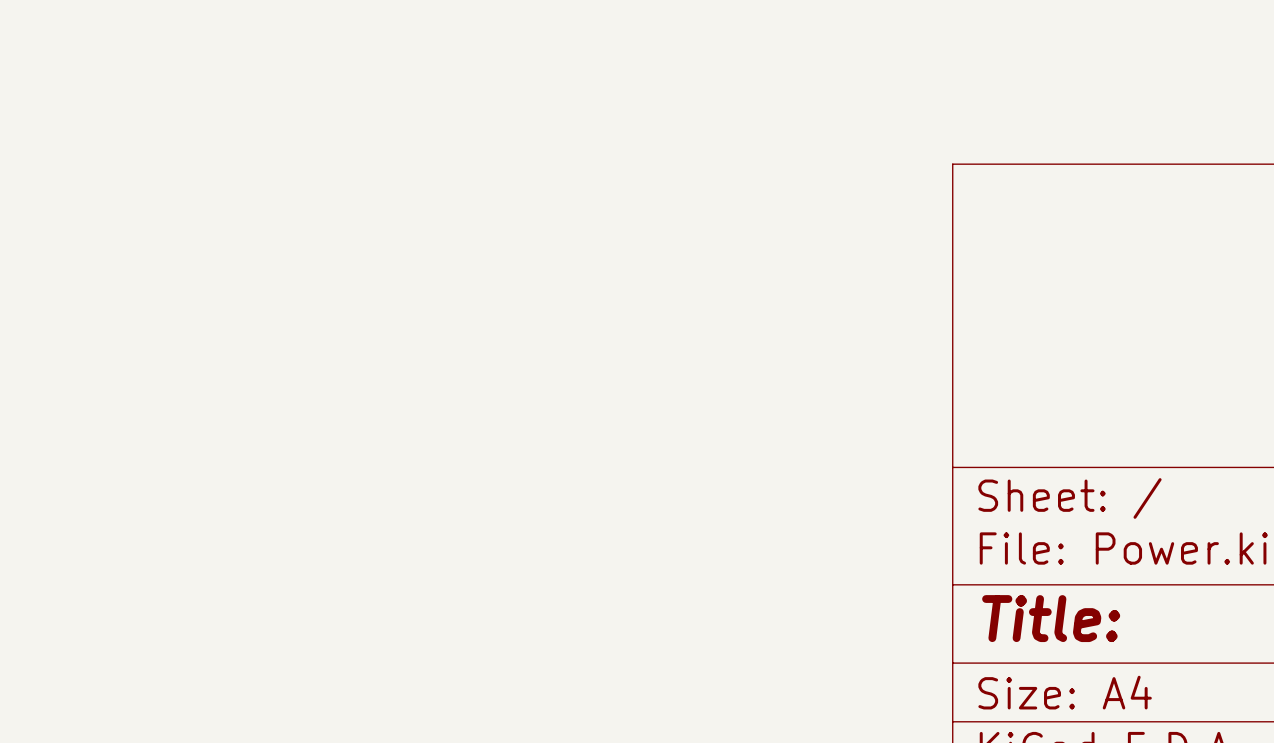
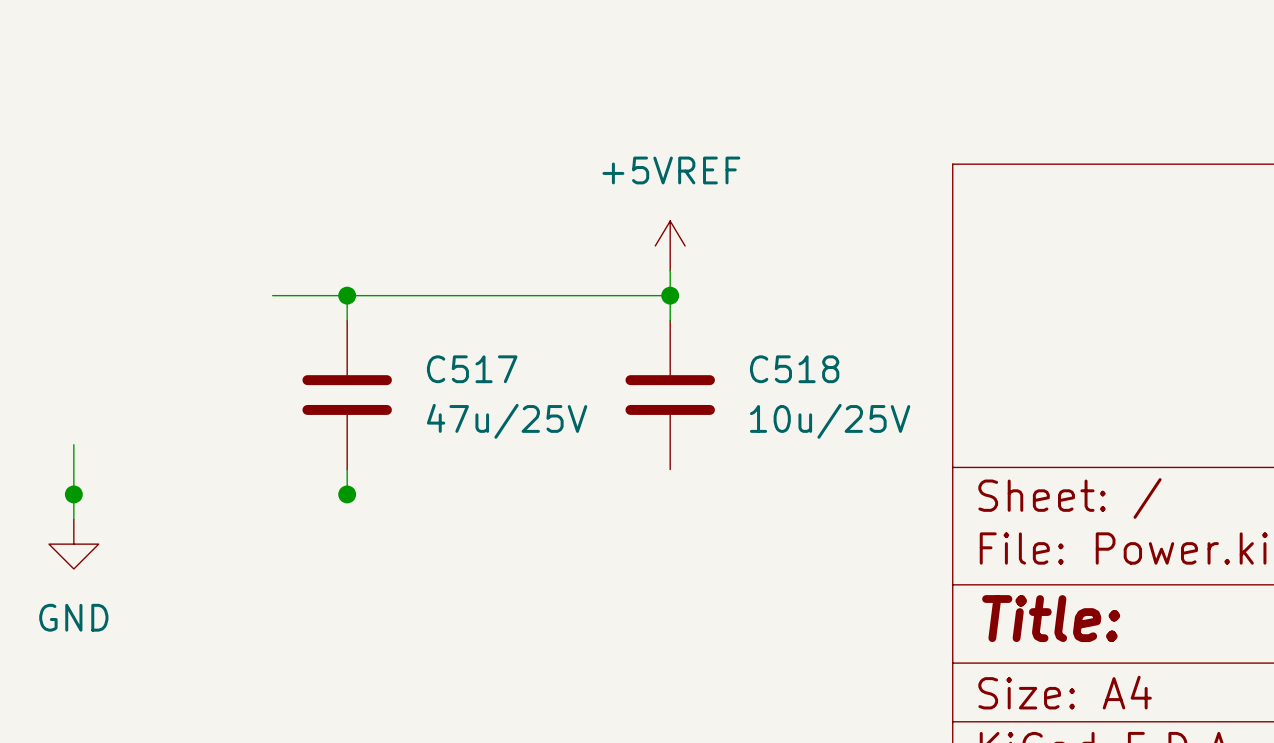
power symbol: none -> +5VREF (670, 245)
wire: none -> (670, 270) (670, 320)
wire: none -> (272, 295) (670, 295)
wire: none -> (347, 295) (347, 320)
junction: none -> (347, 295)
junction: none -> (670, 295)
C517: none -> 47u/25V (347, 395)
C518: none -> 10u/25V (670, 395)
wire: none -> (73, 444) (73, 519)
wire: none -> (347, 469) (347, 494)
junction: none -> (73, 494)
junction: none -> (347, 494)
power symbol: none -> GND (73, 544)

